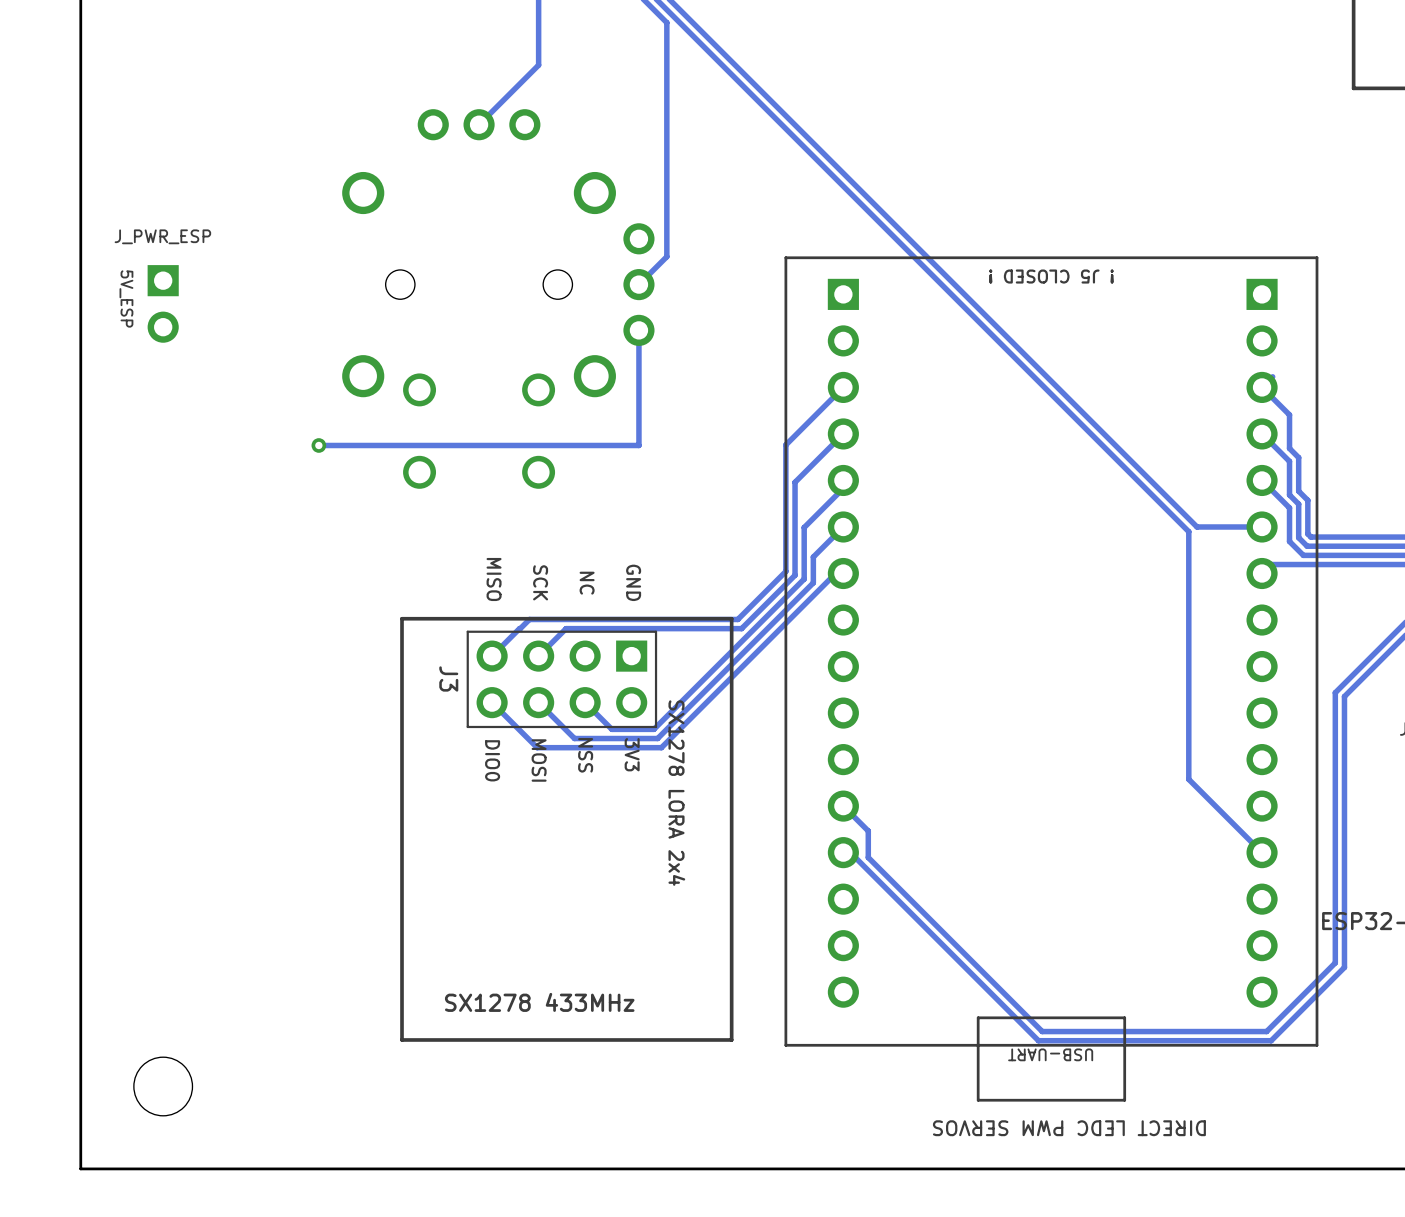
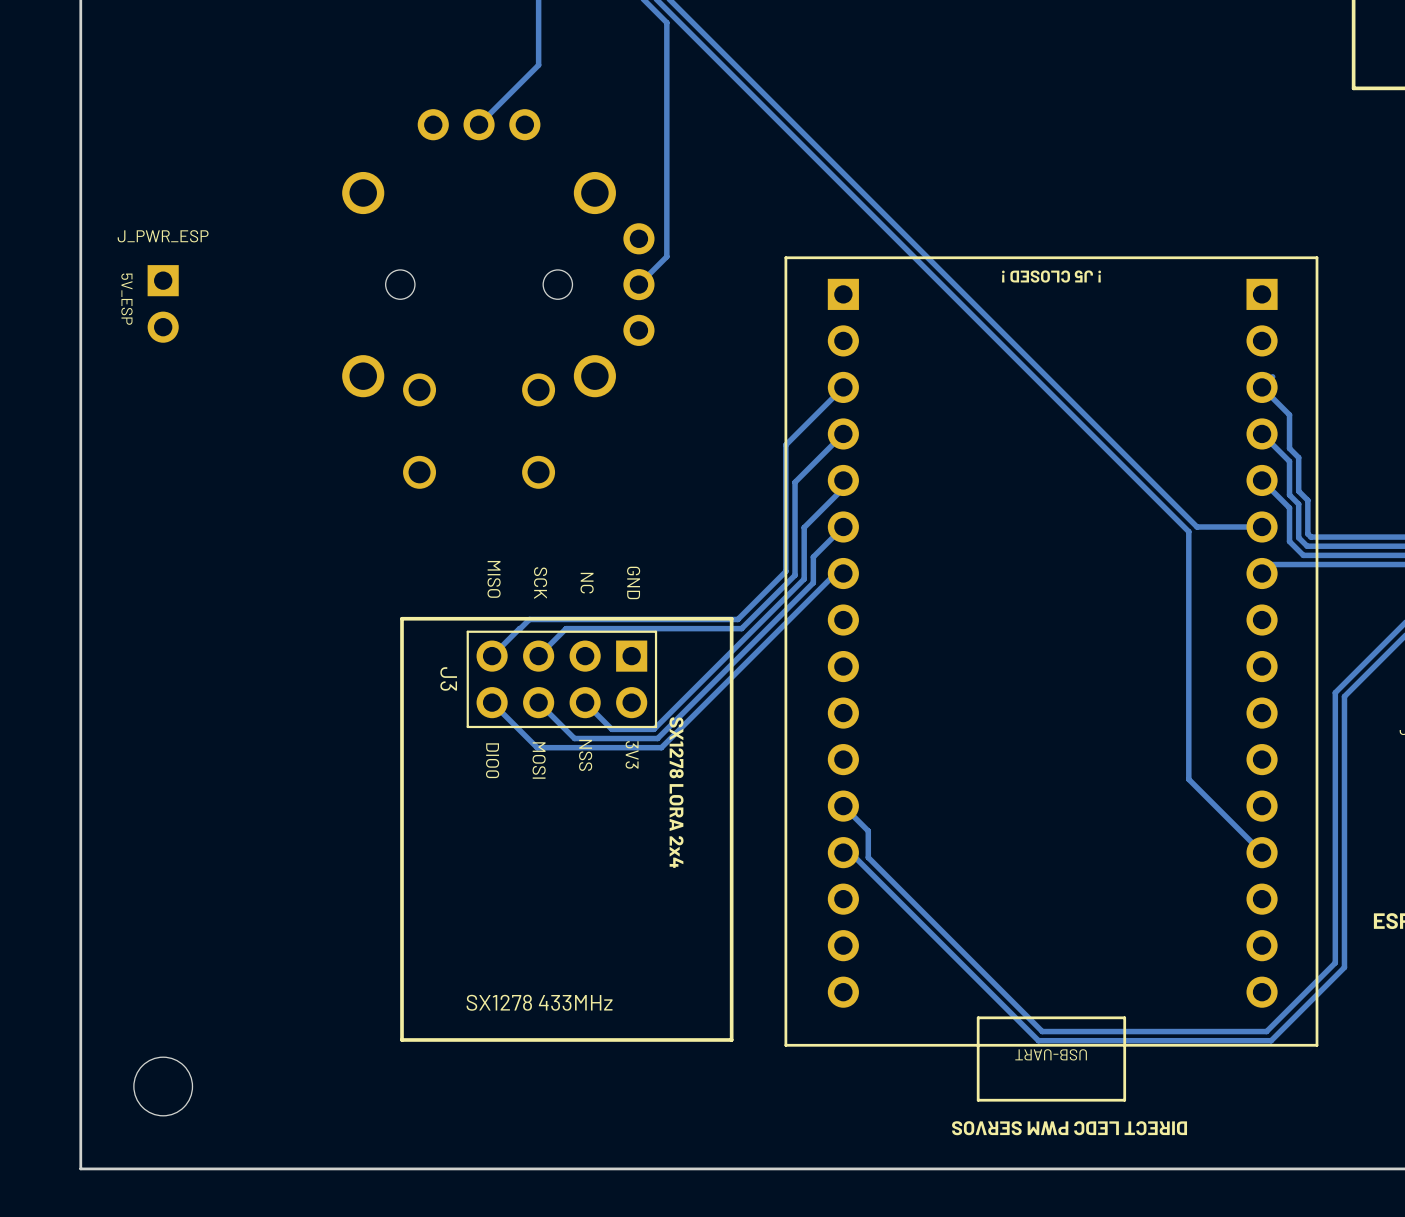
track: (638, 330) (638, 445) (318, 445) -> none
via: (318, 445) -> none

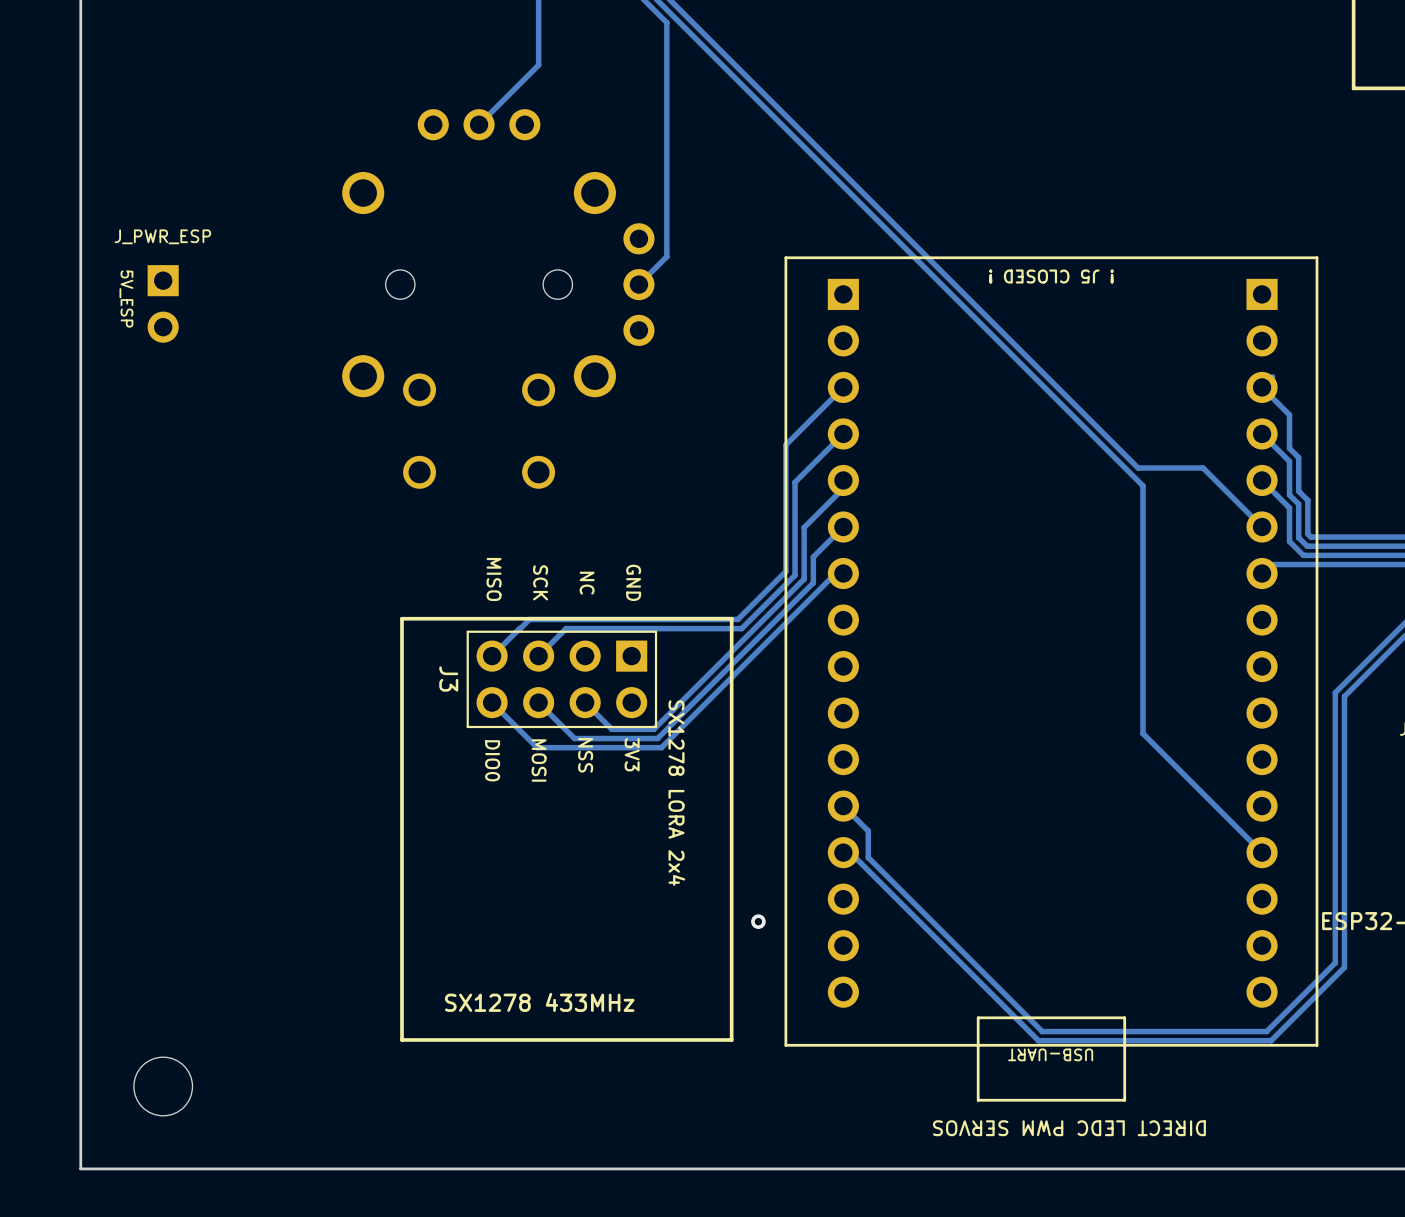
track: (1138, 468) (1197, 526) (1262, 526) -> (1138, 468) (1203, 468) (1262, 526)
track: (1143, 485) (1188, 531) (1188, 779) -> (1143, 485) (1143, 733) (1188, 779)
via: none -> (758, 921)

